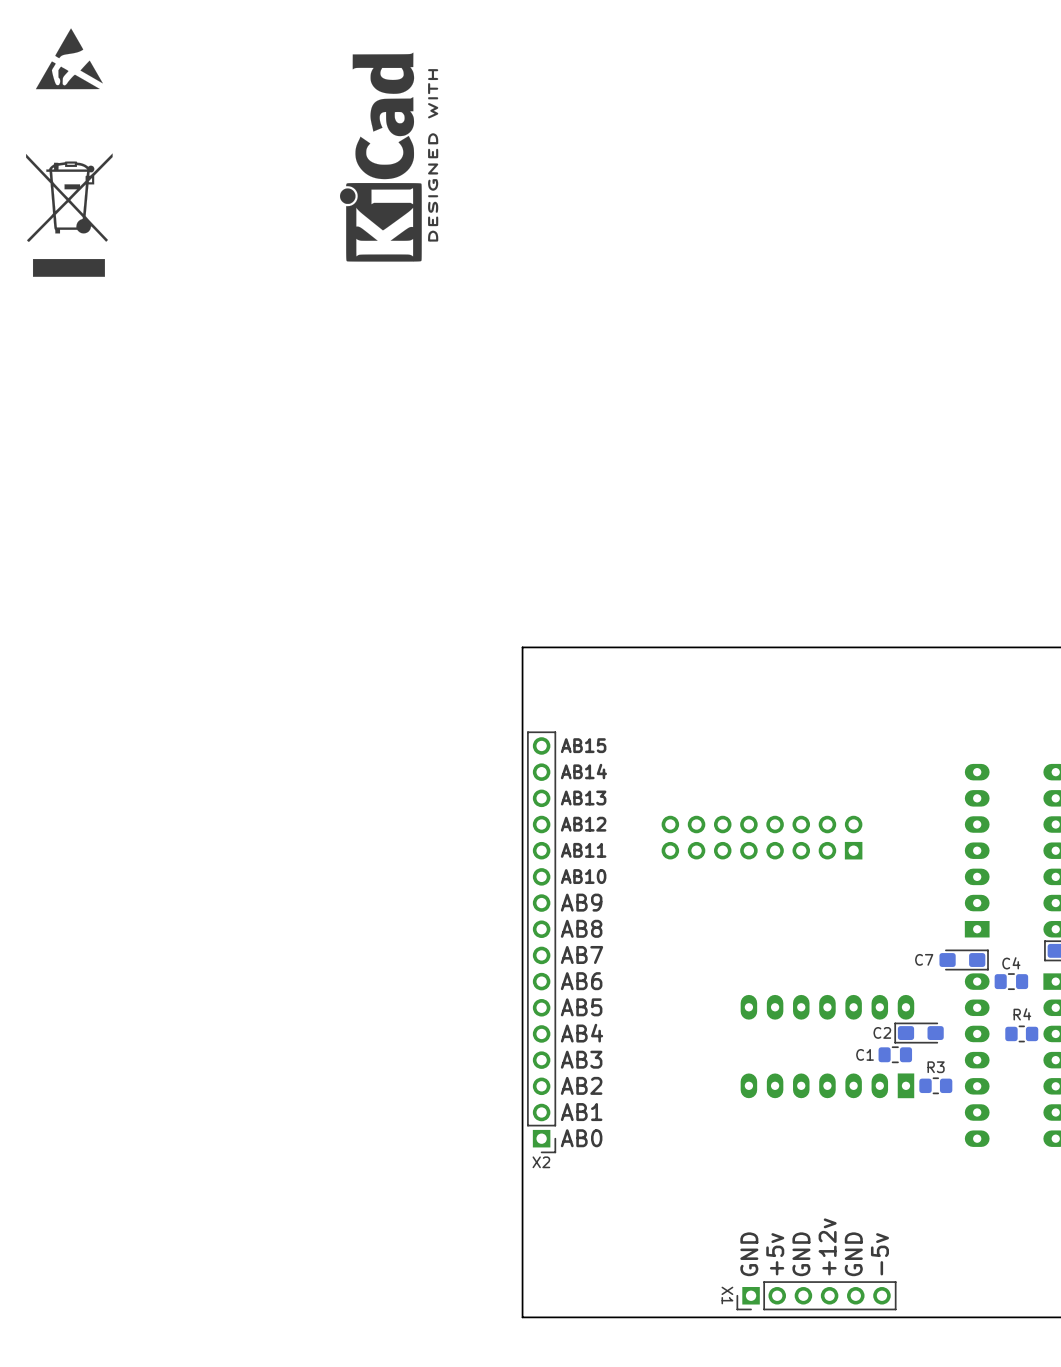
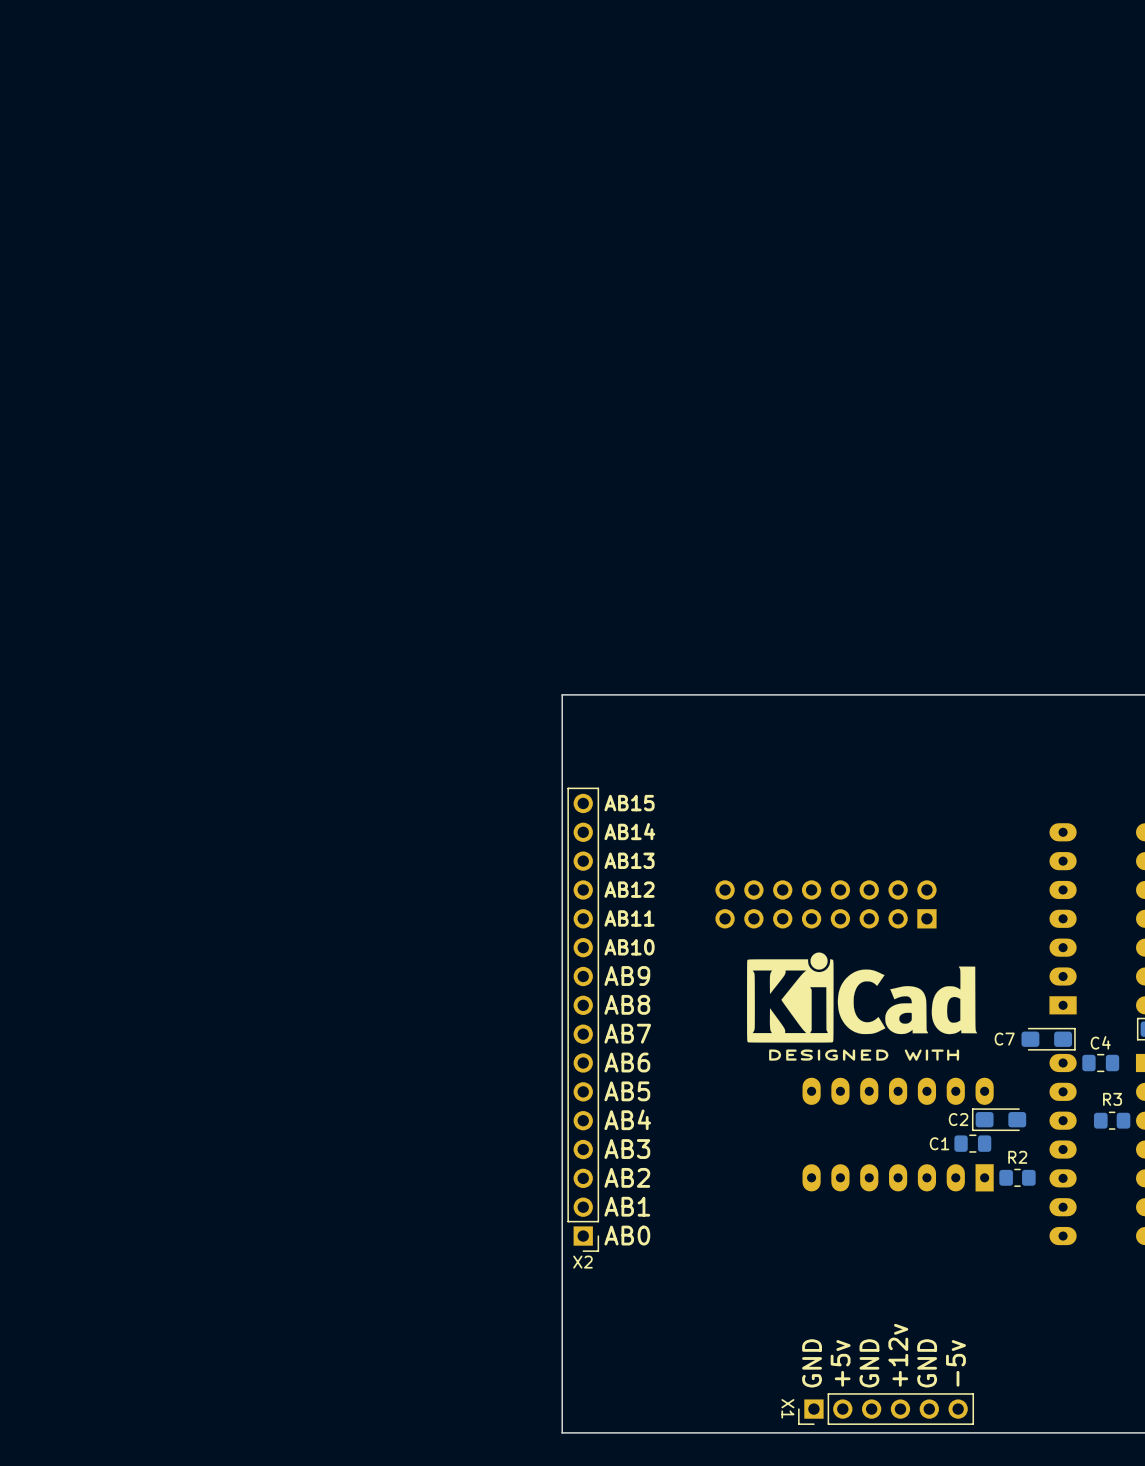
drawing: [35, 28, 103, 90] -> none
drawing: [339, 52, 439, 262] -> none
drawing: [26, 153, 113, 277] -> none
drawing: none -> [746, 952, 978, 1061]
R4 name: R4 (1022, 1014) -> R3 (1112, 1099)
R3 name: R3 (936, 1067) -> R2 (1017, 1157)

